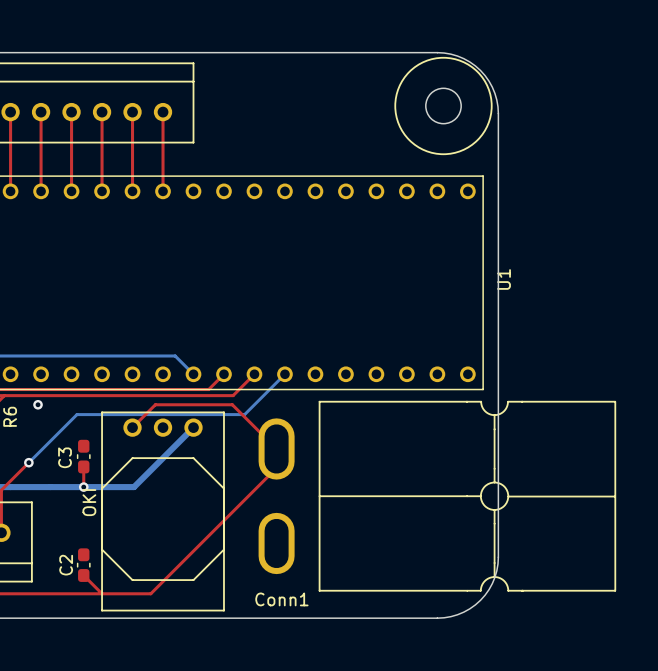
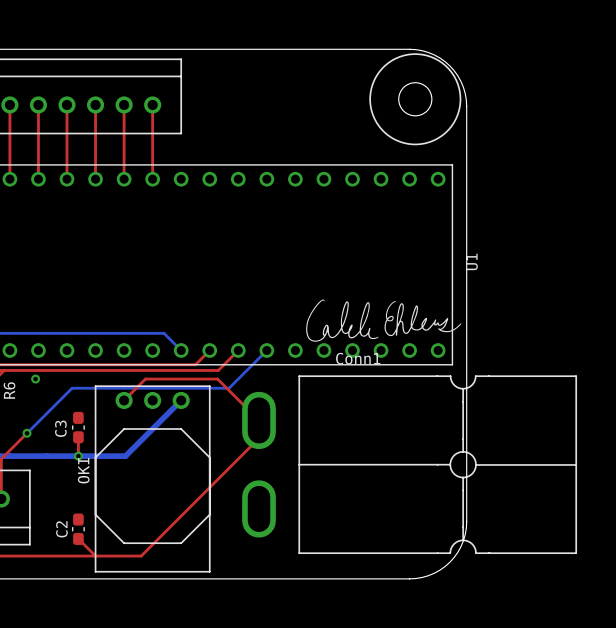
drawing: none -> [306, 299, 462, 342]
Conn1 name position: Conn1 (281, 599) -> Conn1 (358, 358)

